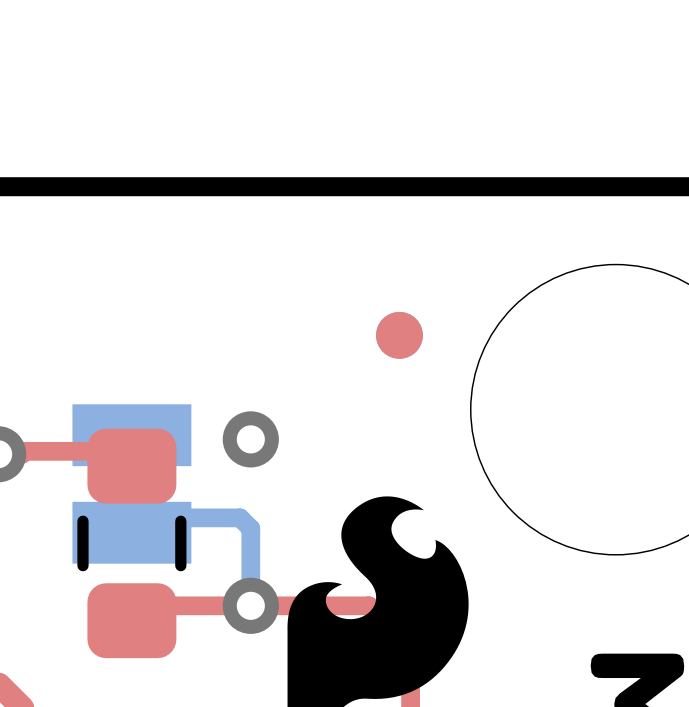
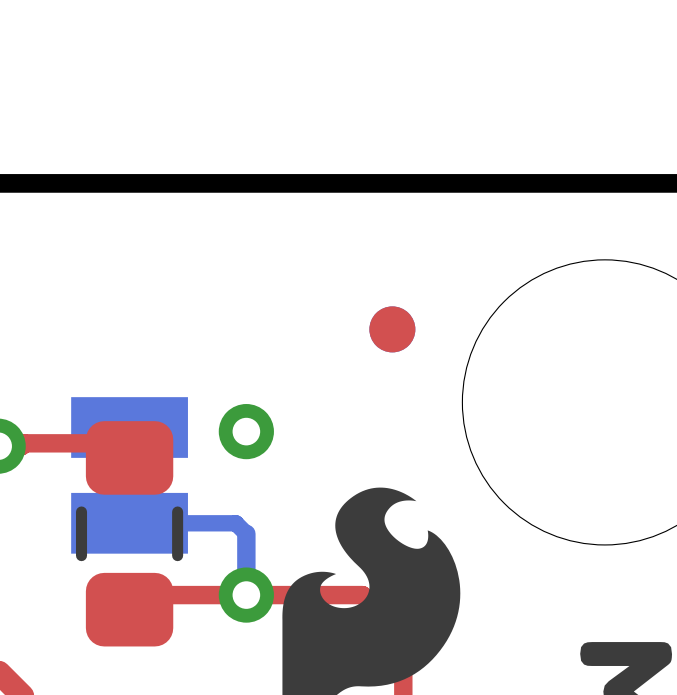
bottom track: (131, 517) (240, 517) (250, 528) (250, 543) -> (129, 523) (235, 523) (246, 533)

